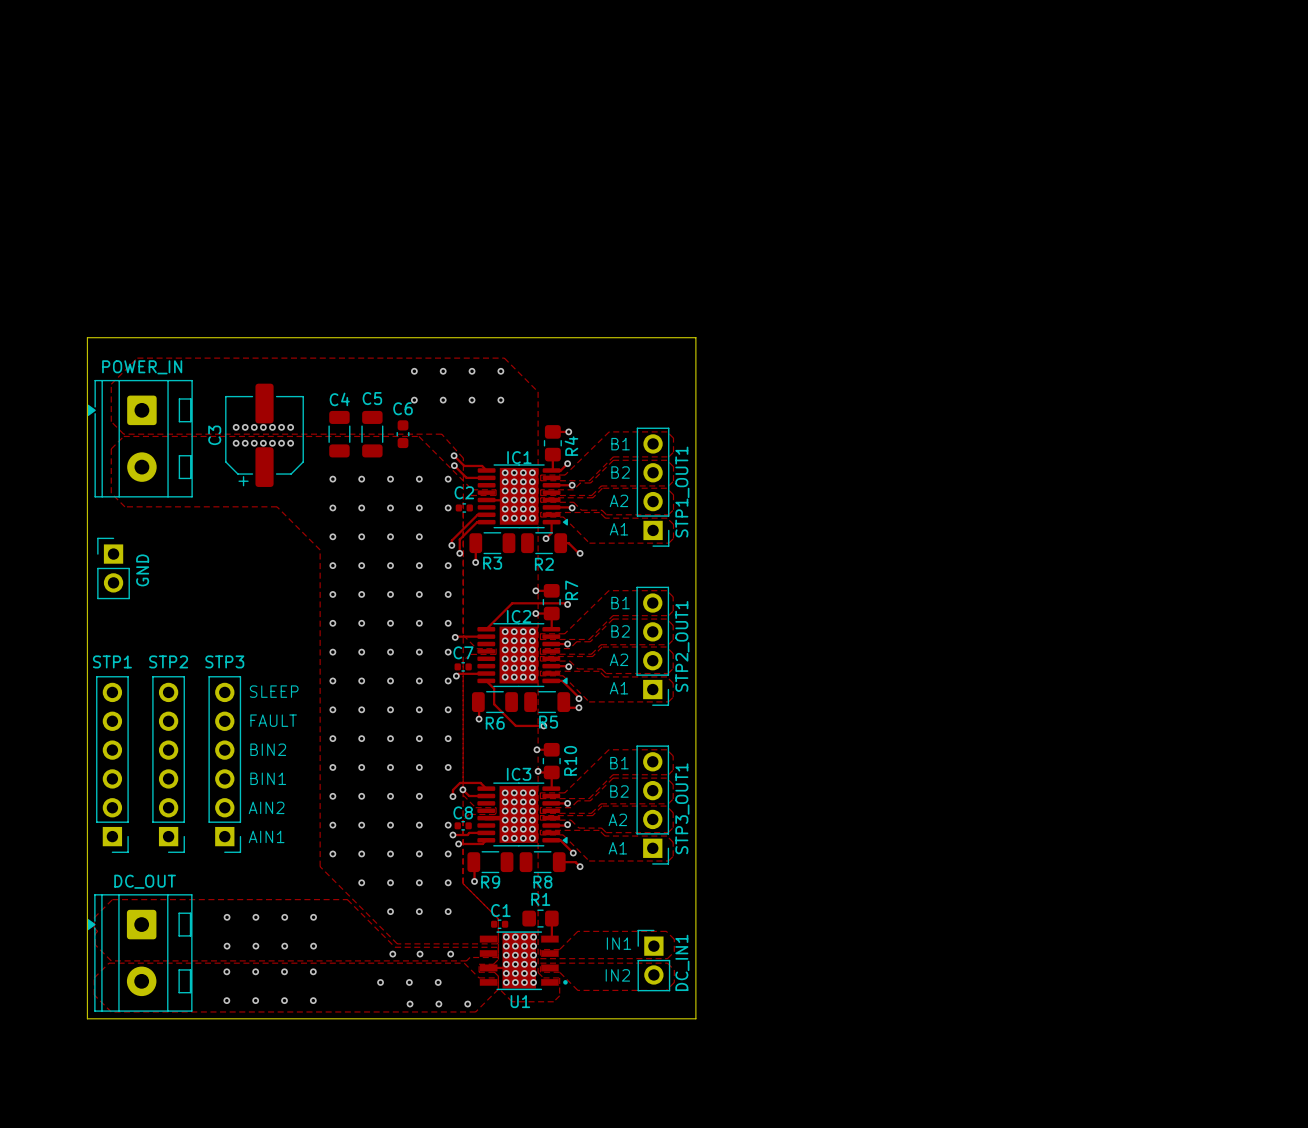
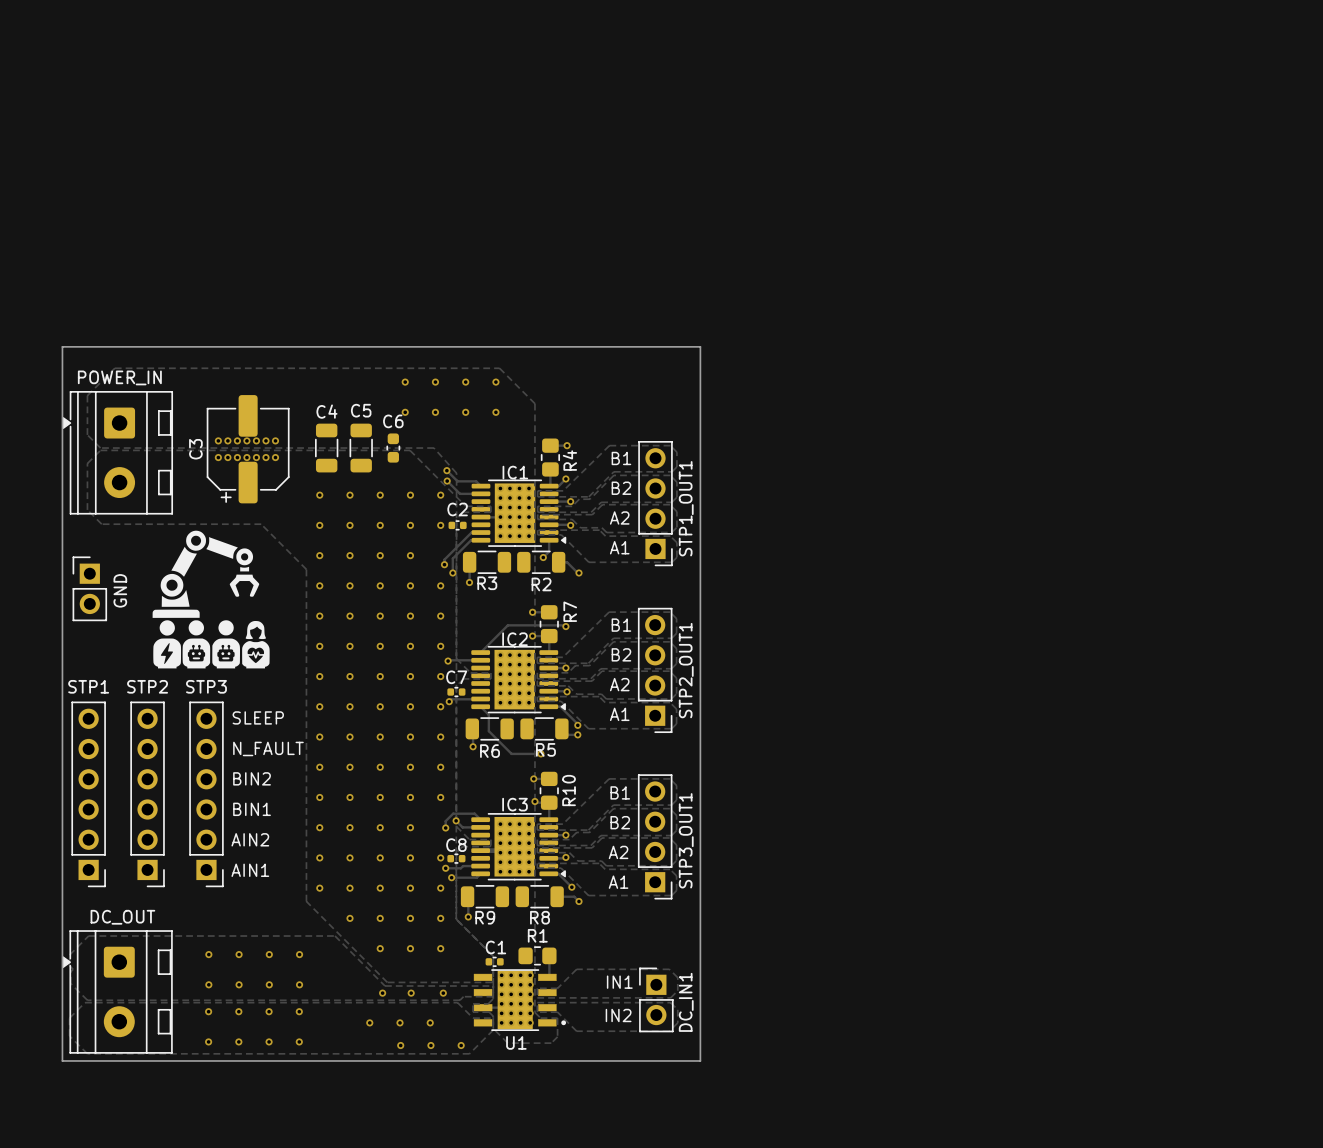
drawing: none -> [152, 530, 270, 669]
text: FAULT (273, 720) -> N_FAULT (268, 748)

